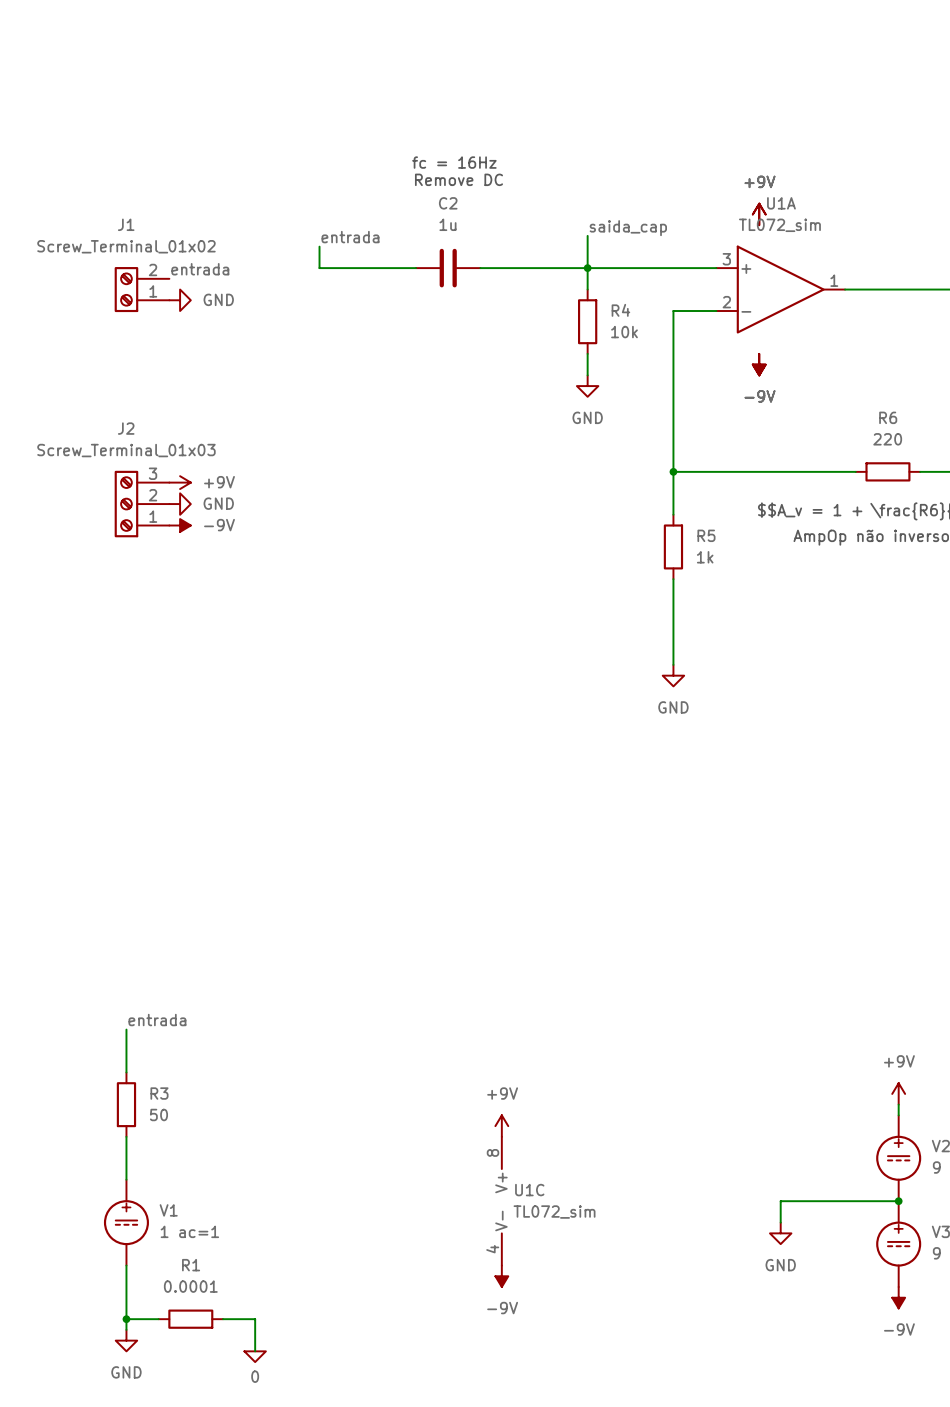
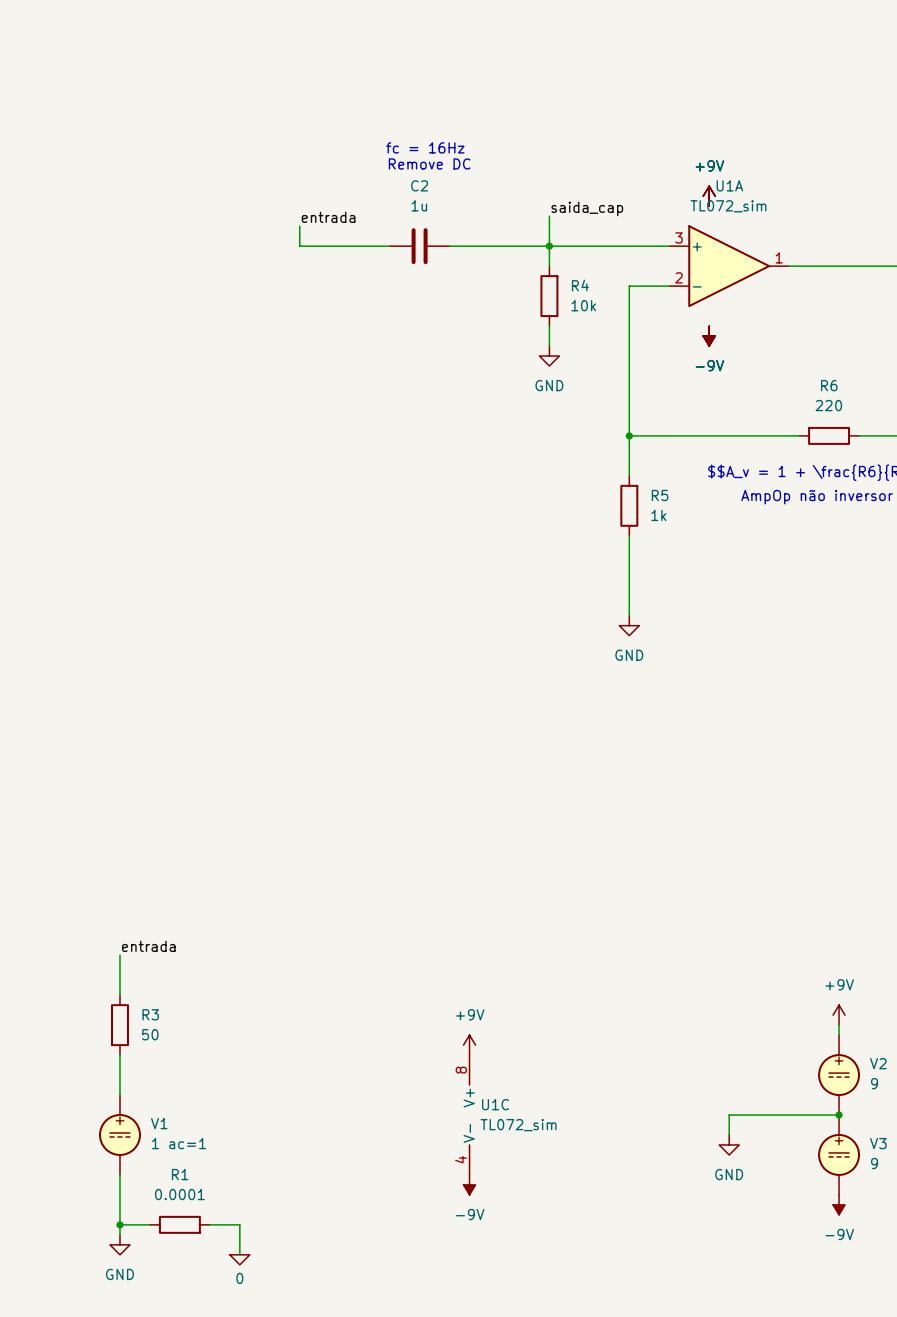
label: entrada (200, 269) -> none
J1: Screw_Terminal_01x02 (142, 289) -> none
power symbol: GND (180, 300) -> none
power symbol: +9V (180, 482) -> none
J2: Screw_Terminal_01x03 (142, 504) -> none
power symbol: GND (180, 504) -> none
power symbol: -9V (180, 525) -> none

